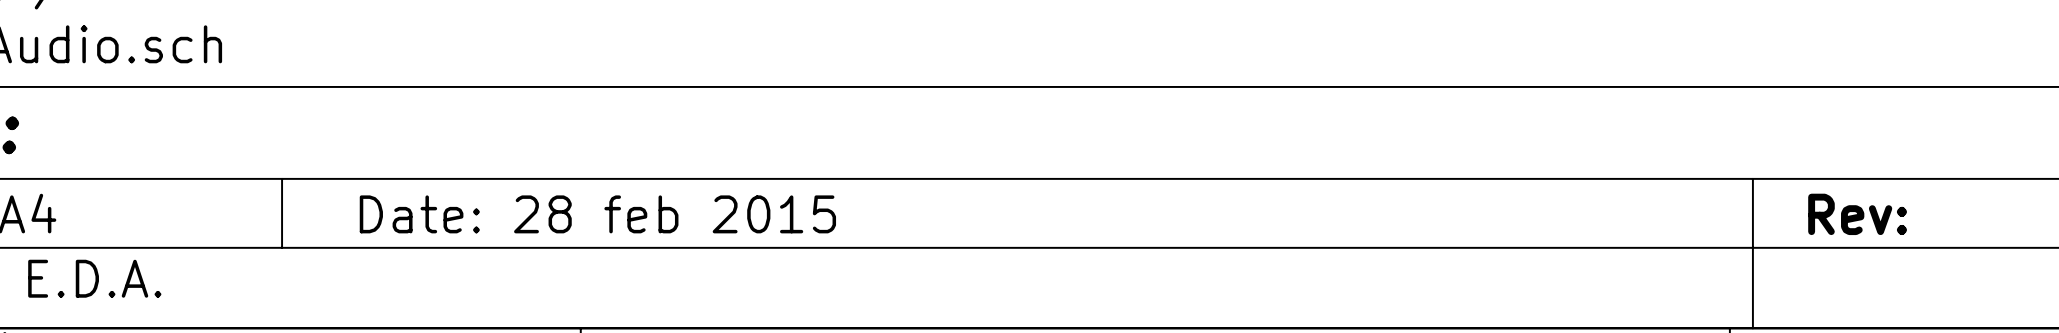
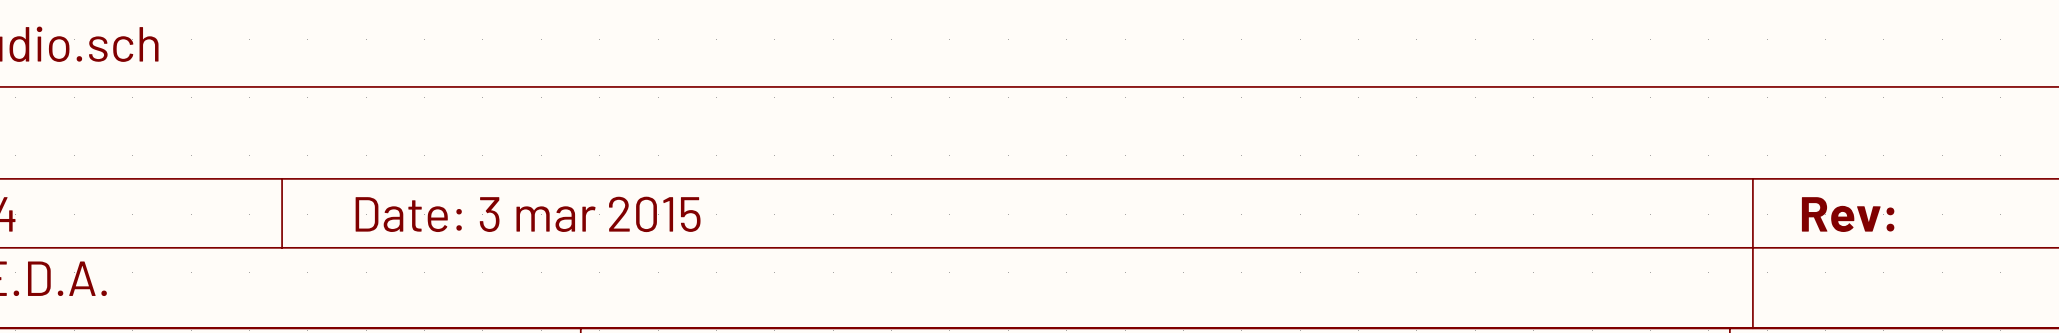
title block: Date: 28 feb 2015 (597, 214) -> Date: 3 mar 2015 (528, 214)

